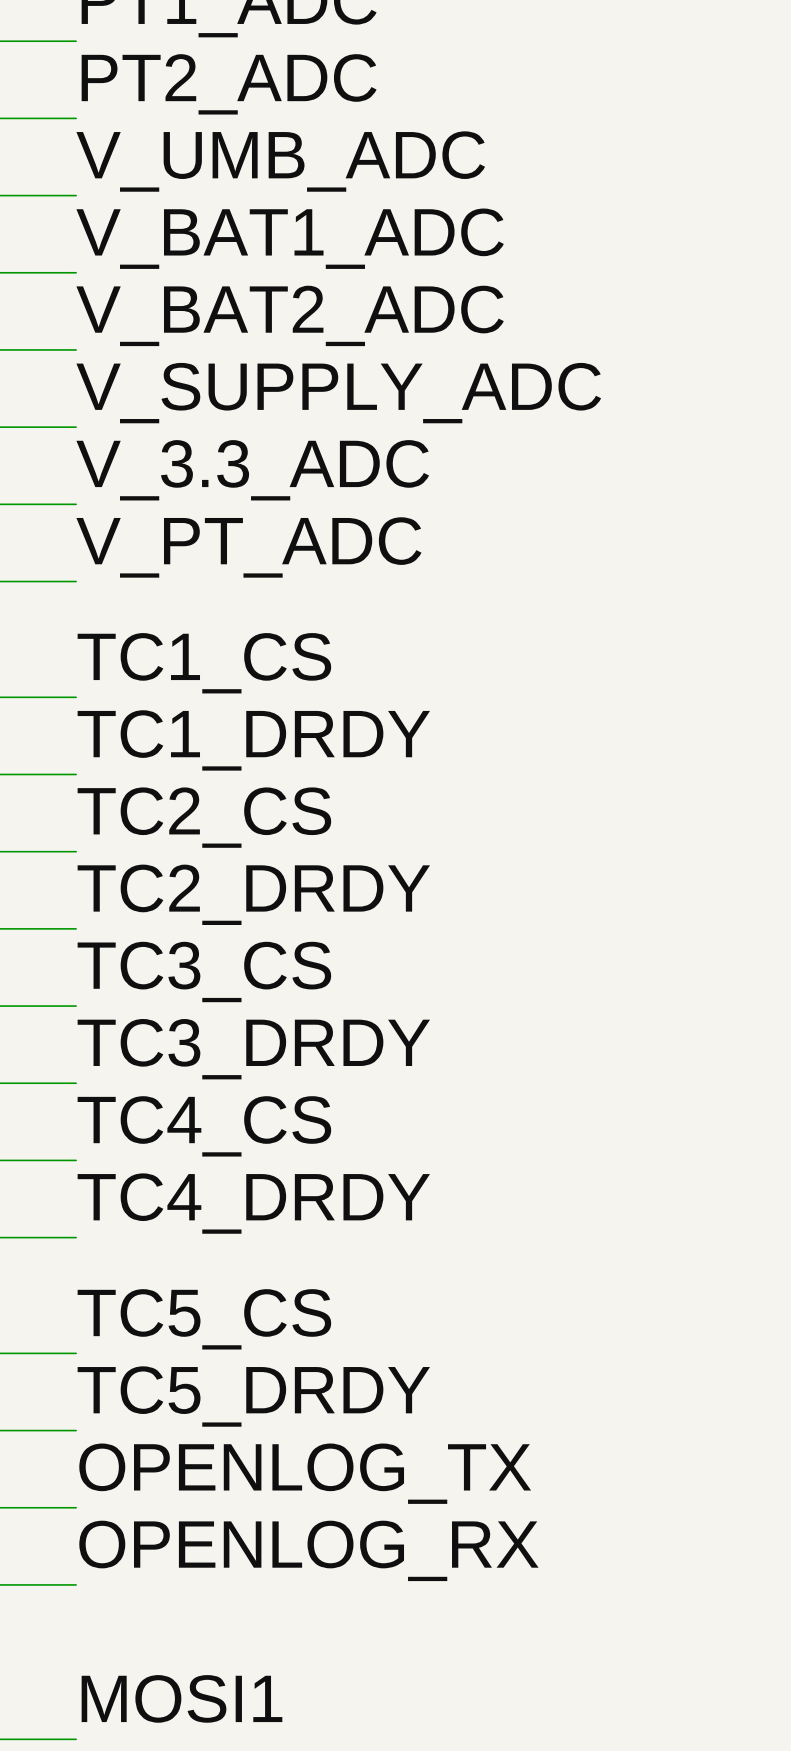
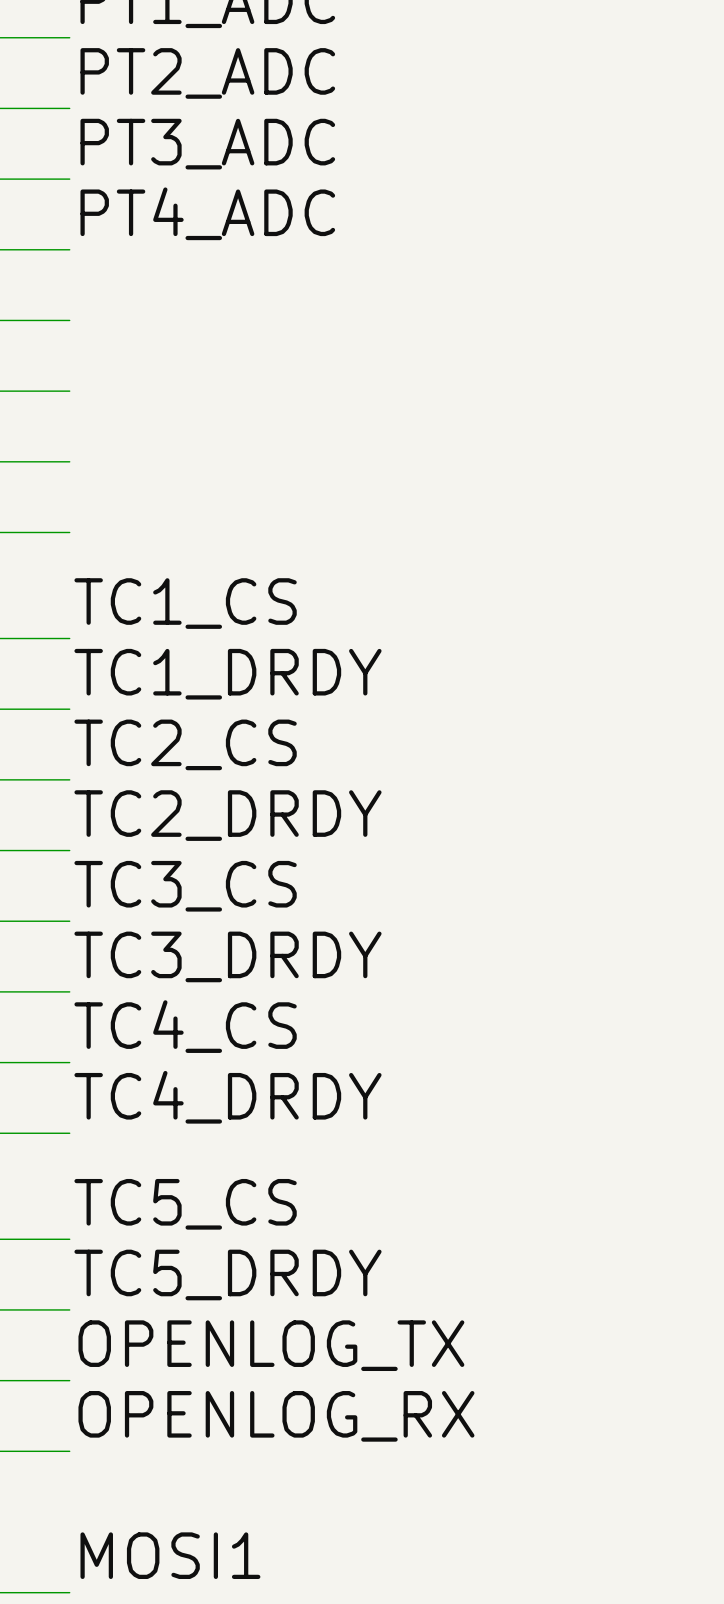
label: V_UMB_ADC (280, 161) -> PT3_ADC (207, 144)
label: V_BAT1_ADC (290, 238) -> PT4_ADC (207, 213)
label: V_BAT2_ADC (290, 315) -> none
label: V_SUPPLY_ADC (338, 393) -> none
label: V_3.3_ADC (252, 470) -> none
label: V_PT_ADC (248, 547) -> none

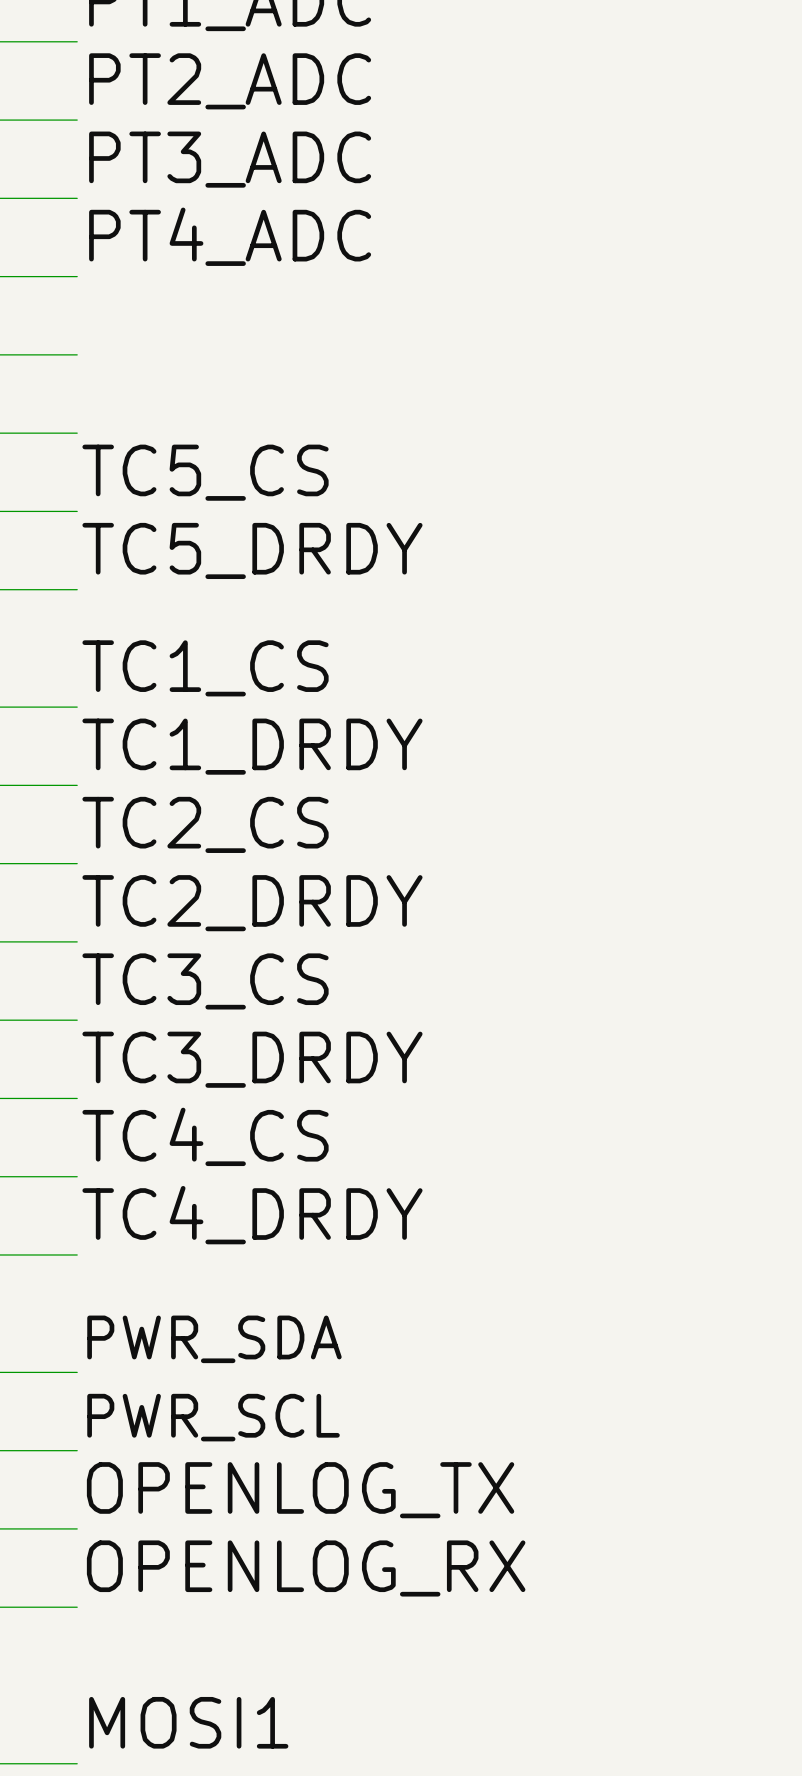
label: none -> TC5_CS (205, 472)
label: none -> TC5_DRDY (252, 550)
label: TC5_CS (185, 1204) -> PWR_SDA (214, 1339)
label: TC5_DRDY (227, 1274) -> PWR_SCL (213, 1417)

